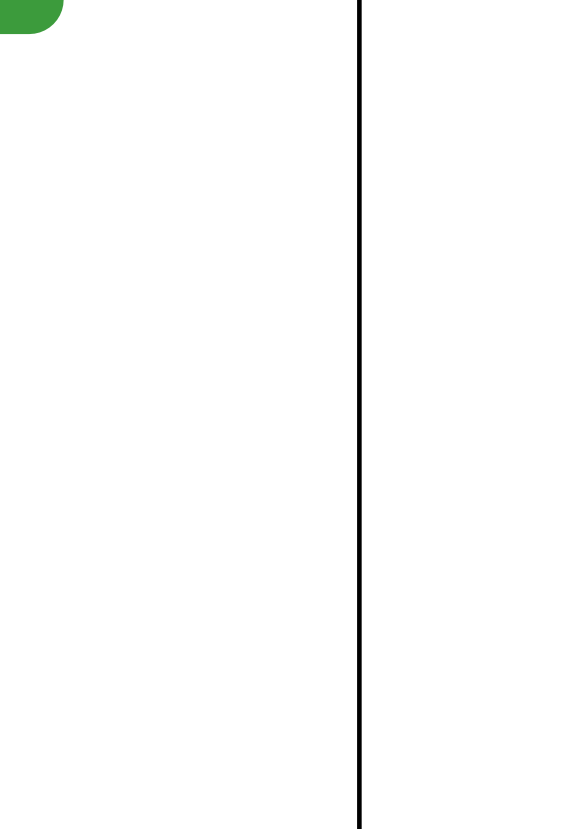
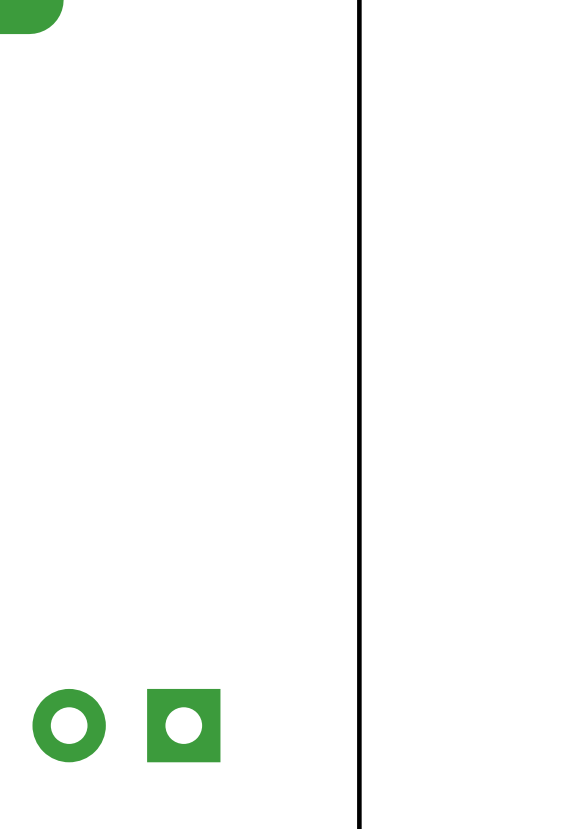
part: none -> (126, 725)

